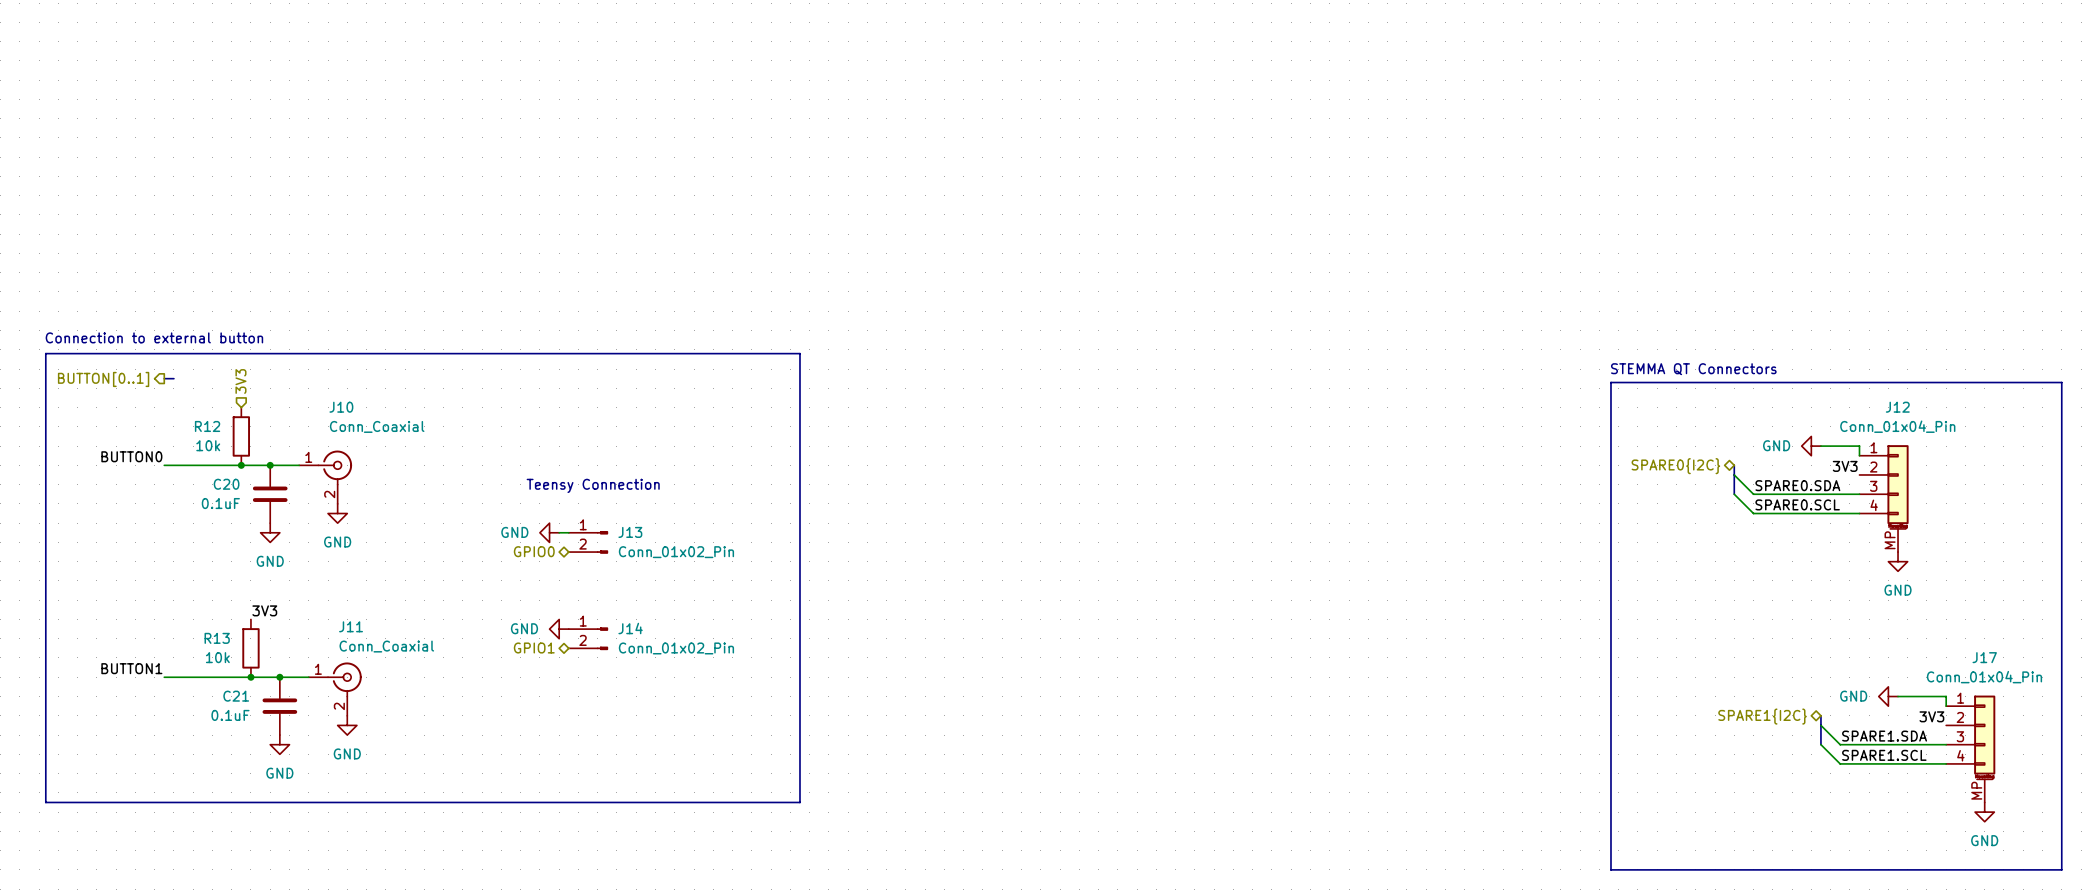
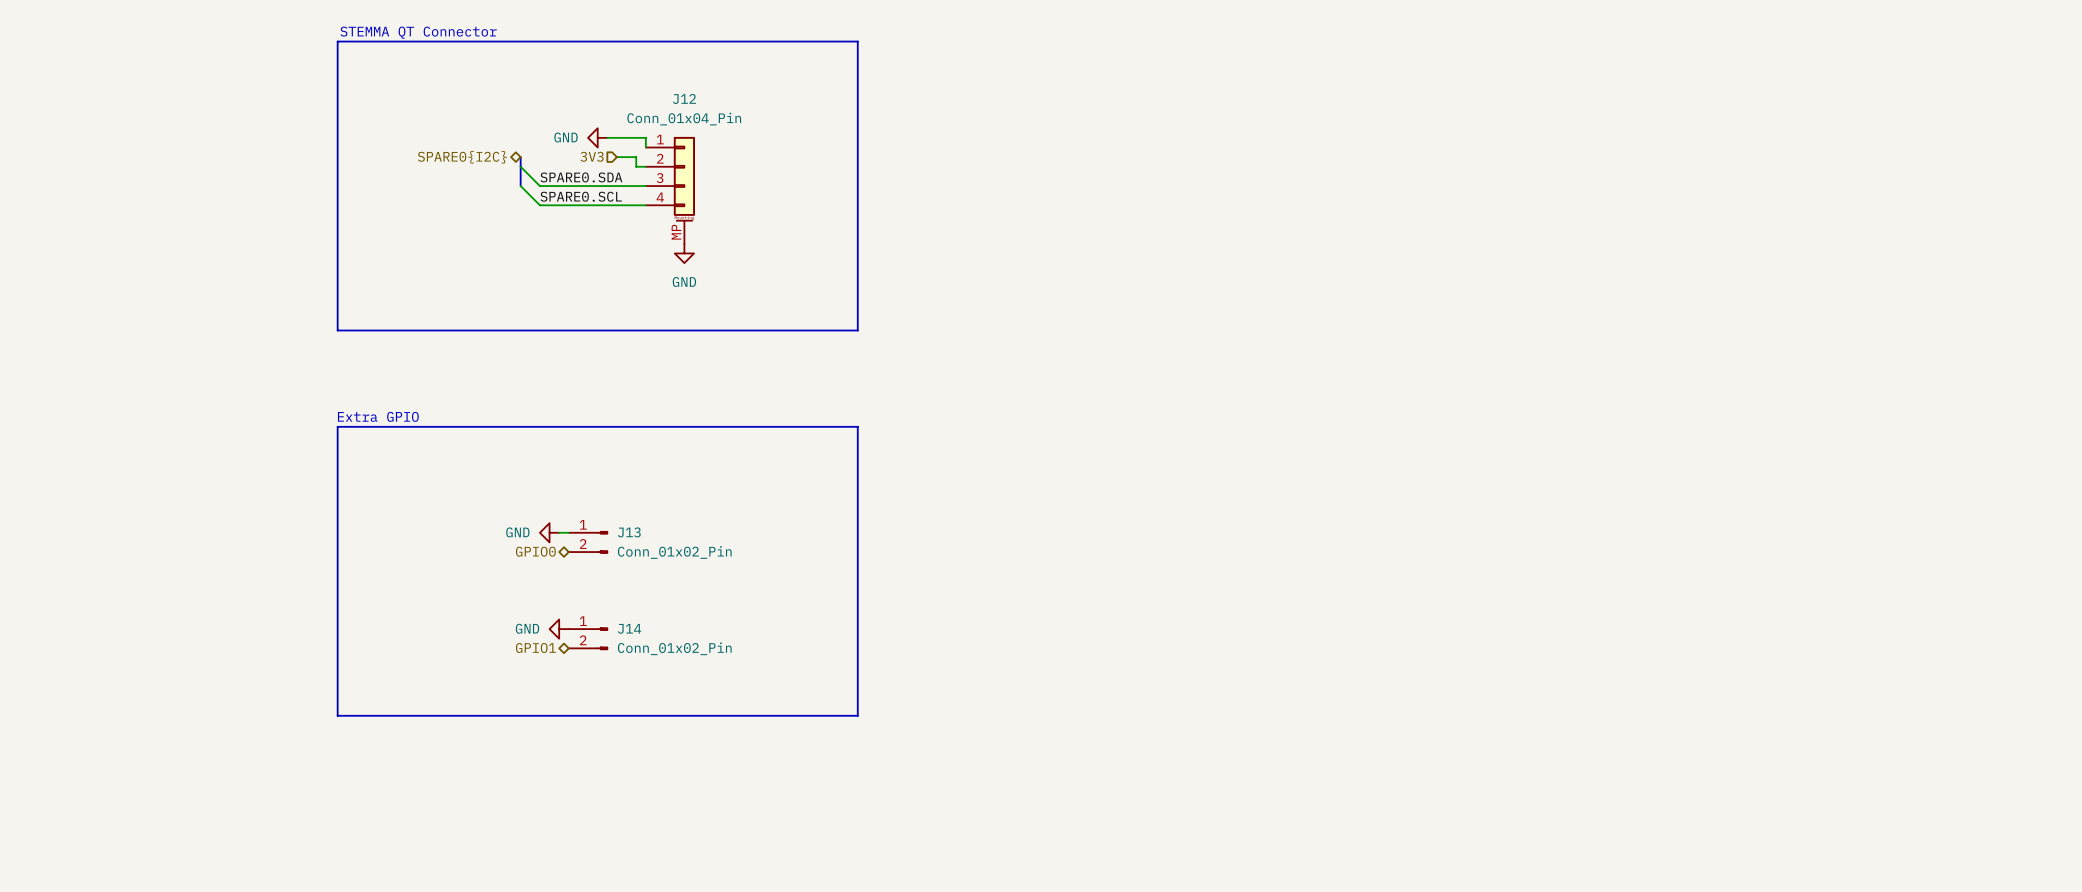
text: none -> STEMMA QT Connector (418, 32)
line: none -> (337, 41) (857, 41) (857, 330) (337, 330) (337, 41)
power symbol: none -> GND (597, 137)
wire: none -> (607, 137) (645, 137) (645, 147)
hierarchical label: none -> 3V3 (592, 156)
hierarchical label: none -> SPARE0{I2C} (462, 157)
bus: none -> (520, 157) (520, 186)
wire: none -> (616, 157) (636, 157) (636, 166) (645, 166)
wire: none -> (520, 166) (539, 186) (645, 186)
label: none -> SPARE0.SDA (581, 177)
wire: none -> (520, 186) (539, 205) (645, 205)
label: none -> SPARE0.SCL (581, 196)
power symbol: none -> GND (684, 253)
text: Connection to external button (154, 337) -> none
line: (45, 353) (799, 353) (799, 802) (45, 802) (45, 353) -> none
text: STEMMA QT Connectors (1693, 369) -> none
bus: (164, 378) (173, 378) -> none
hierarchical label: BUTTON[0..1] (103, 379) -> none
hierarchical label: 3V3 (240, 381) -> none
line: (1610, 382) (2061, 382) (2061, 869) (1610, 869) (1610, 382) -> none
text: none -> Extra GPIO (378, 416)
line: none -> (337, 426) (337, 715) (857, 715) (857, 426) (337, 426)
R12: 10k (241, 436) -> none
power symbol: GND (1811, 446) -> none
wire: (1820, 446) (1859, 446) (1859, 455) -> none
label: BUTTON0 (131, 456) -> none
wire: (164, 465) (299, 465) -> none
junction: (241, 465) -> none
junction: (270, 465) -> none
bus: (1734, 465) (1734, 494) -> none
hierarchical label: SPARE0{I2C} (1675, 466) -> none
label: 3V3 (1845, 466) -> none
wire: (1734, 474) (1753, 494) (1859, 494) -> none
J10: Conn_Coaxial (325, 477) -> none
text: Teensy Connection (593, 485) -> none
label: SPARE0.SDA (1797, 485) -> none
C20: 0.1uF (270, 494) -> none
wire: (1734, 494) (1753, 513) (1859, 513) -> none
J12 position: (1884, 498) -> (670, 190)
label: SPARE0.SCL (1797, 504) -> none
power symbol: GND (337, 513) -> none
power symbol: GND (270, 532) -> none
power symbol: GND (1898, 561) -> none
label: 3V3 (264, 610) -> none
R13: 10k (250, 648) -> none
label: BUTTON1 (131, 668) -> none
wire: (164, 677) (308, 677) -> none
junction: (250, 677) -> none
junction: (279, 677) -> none
J11: Conn_Coaxial (335, 689) -> none
power symbol: GND (1888, 696) -> none
wire: (1898, 696) (1946, 696) (1946, 706) -> none
C21: 0.1uF (279, 706) -> none
bus: (1820, 715) (1820, 744) -> none
hierarchical label: SPARE1{I2C} (1762, 716) -> none
label: 3V3 (1931, 716) -> none
power symbol: GND (347, 725) -> none
wire: (1820, 725) (1840, 744) (1946, 744) -> none
label: SPARE1.SDA (1884, 736) -> none
power symbol: GND (279, 744) -> none
wire: (1820, 744) (1840, 763) (1946, 763) -> none
J17: Conn_01x04_Pin (1970, 749) -> none
label: SPARE1.SCL (1884, 755) -> none
power symbol: GND (1984, 812) -> none

